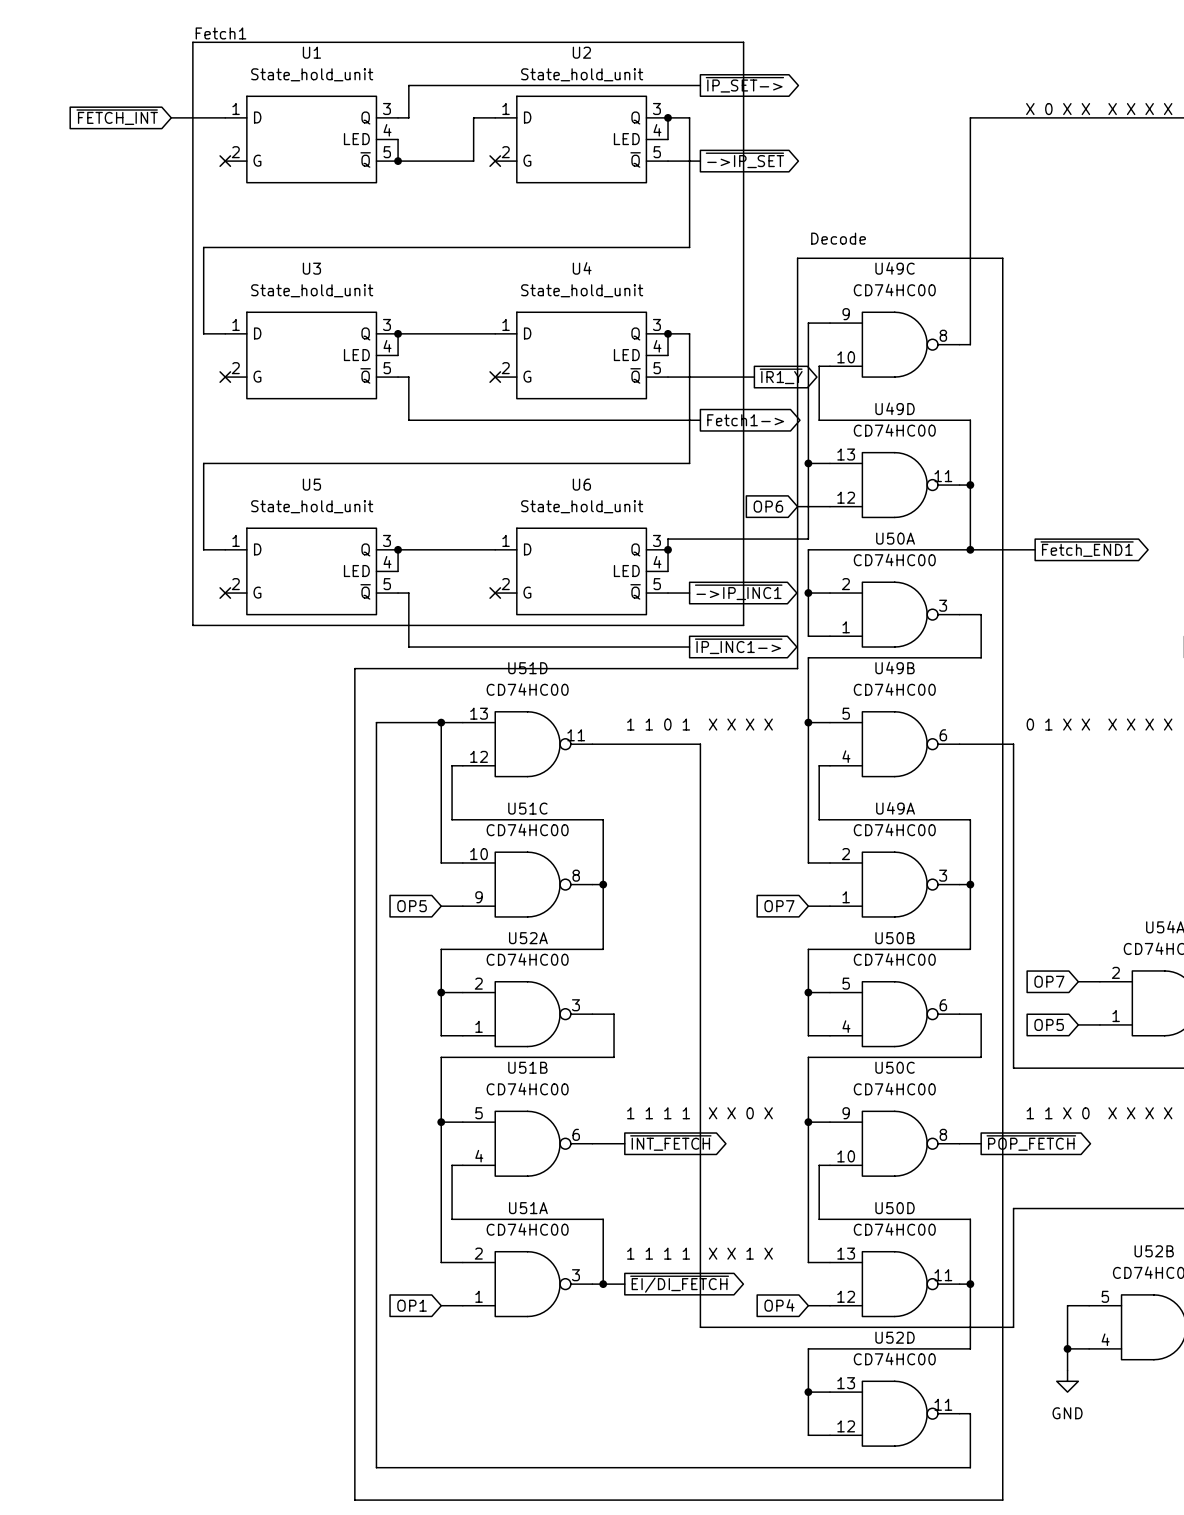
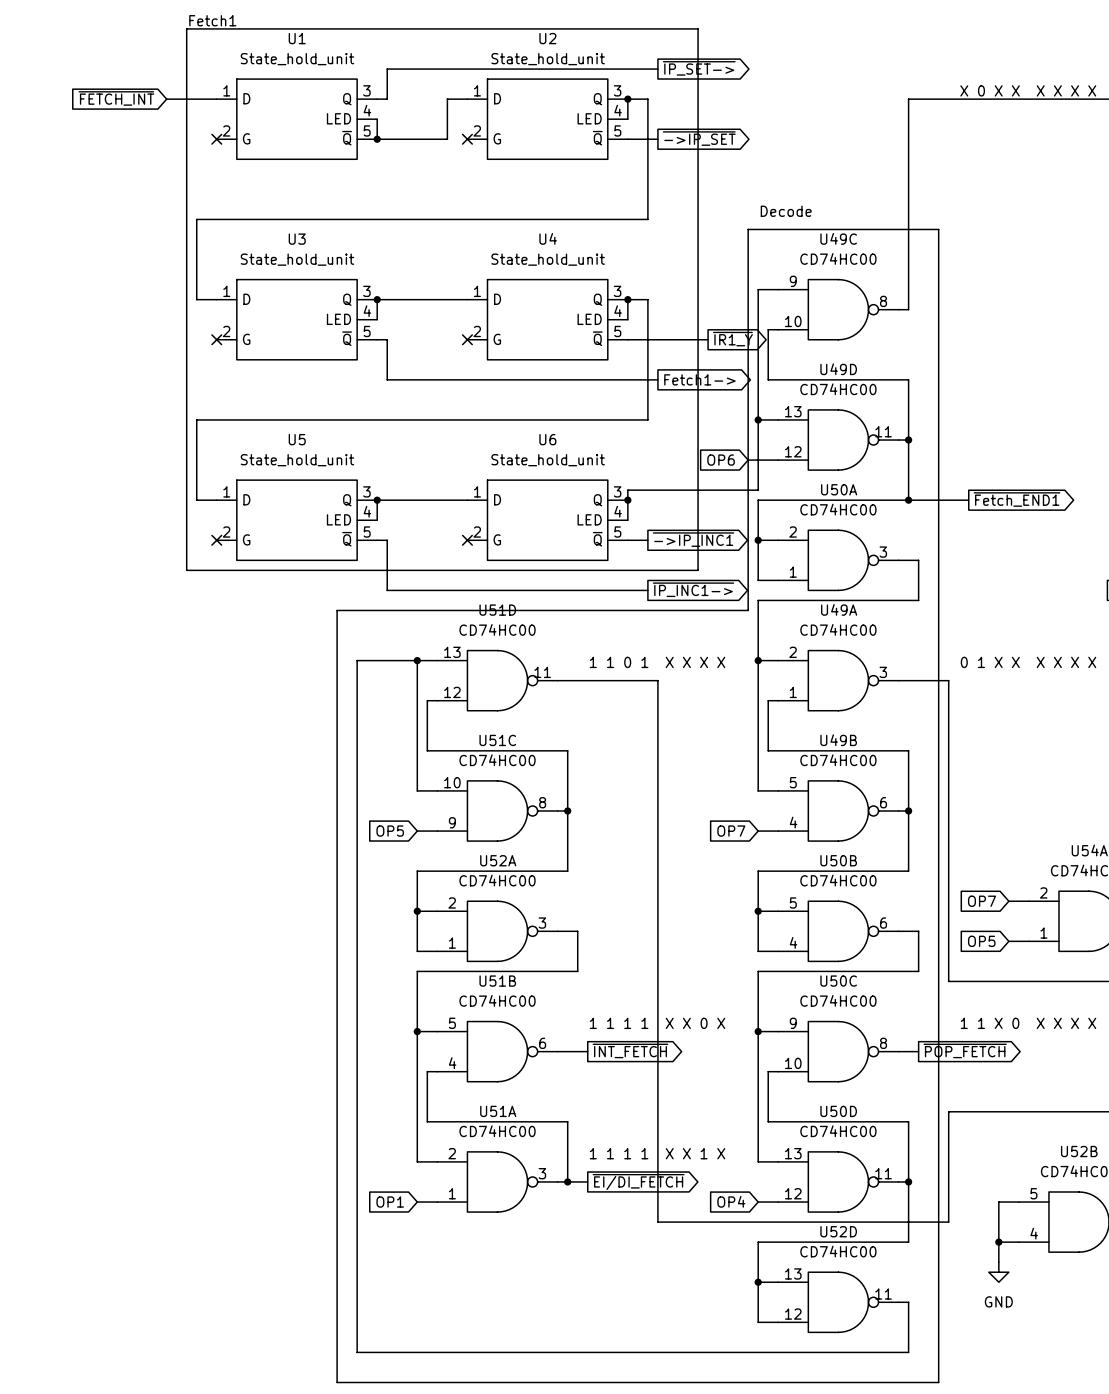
U49B position: (894, 744) -> (838, 811)
U49A position: (894, 884) -> (838, 680)

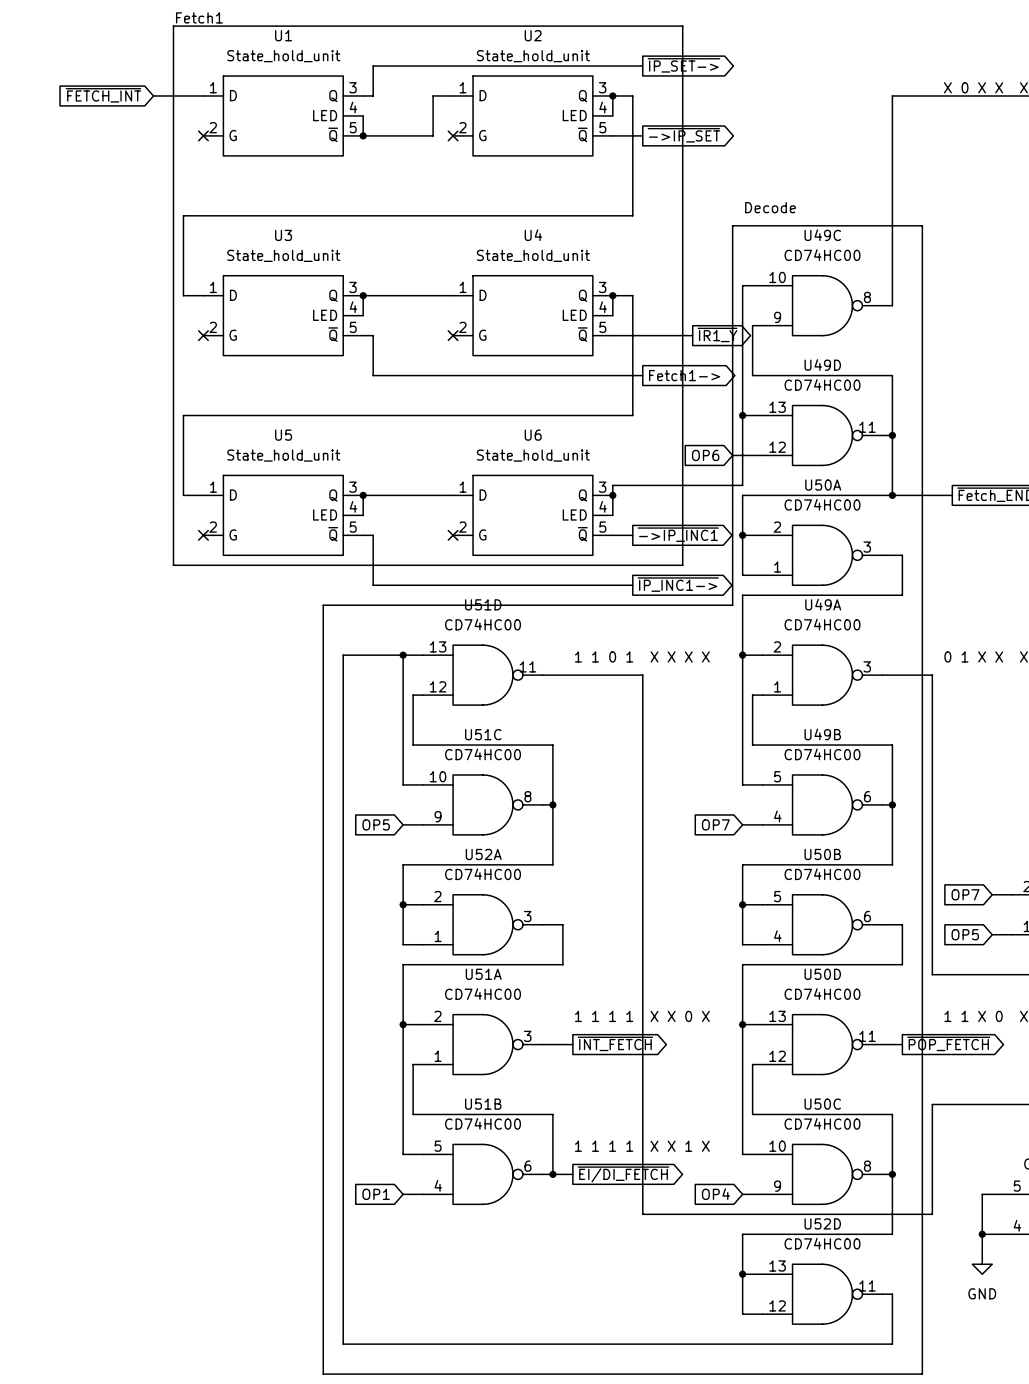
U49C flip: as is (838, 309) -> up-down (822, 305)
U51B position: (497, 1051) -> (483, 1174)
U50C flip: as is (838, 1051) -> up-down (822, 1174)
U50C position: (838, 1051) -> (822, 1174)
U51A position: (497, 1181) -> (483, 1044)
U50D position: (838, 1181) -> (822, 1044)

